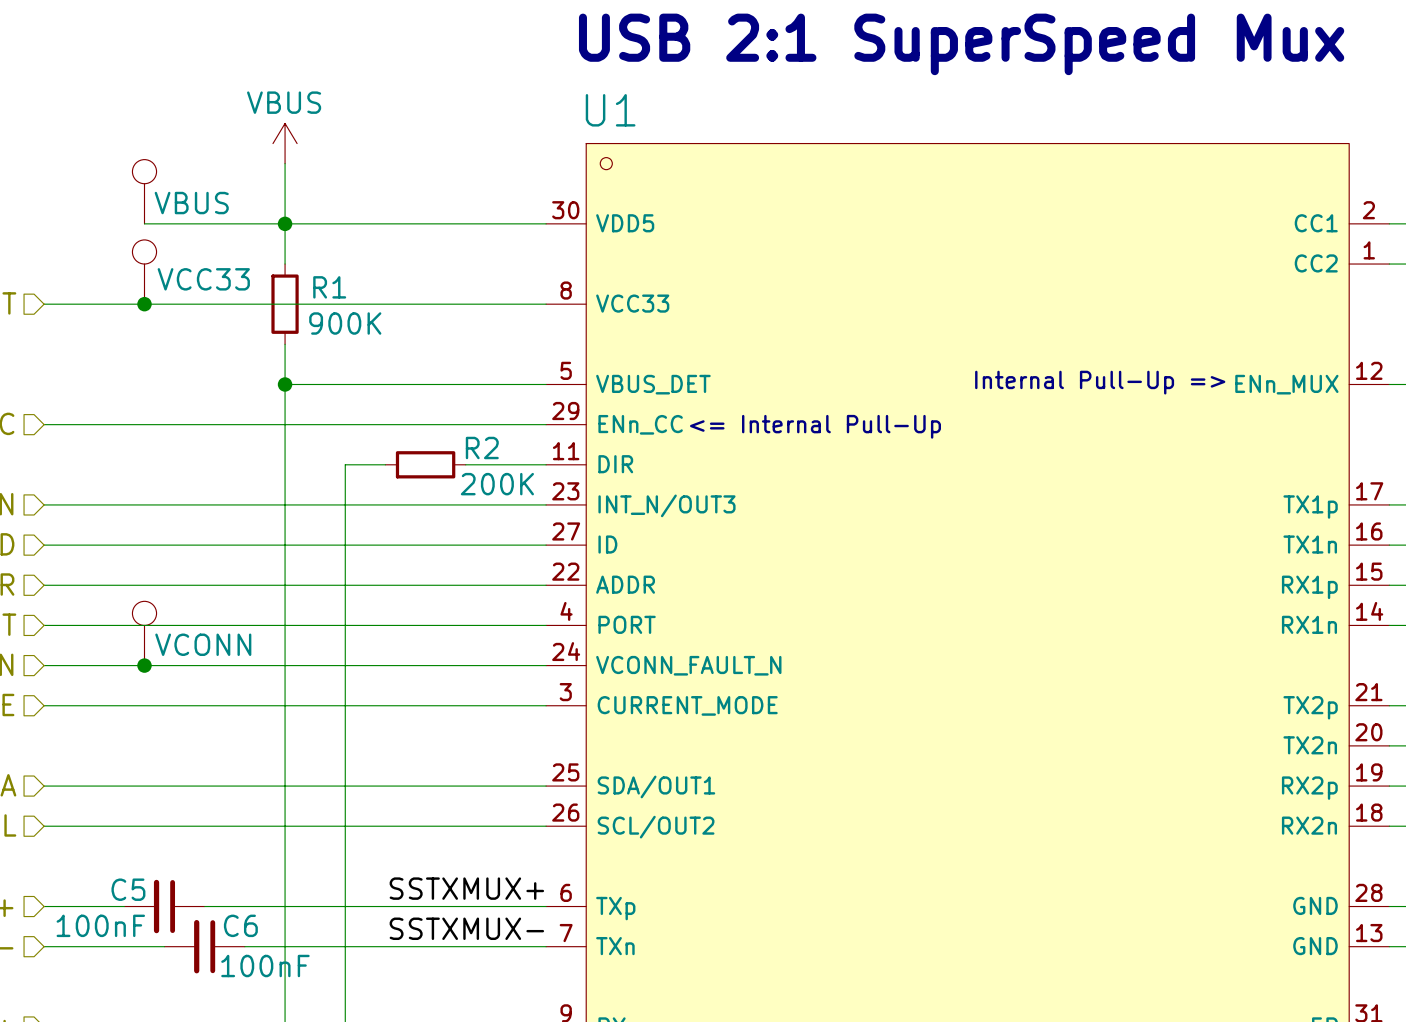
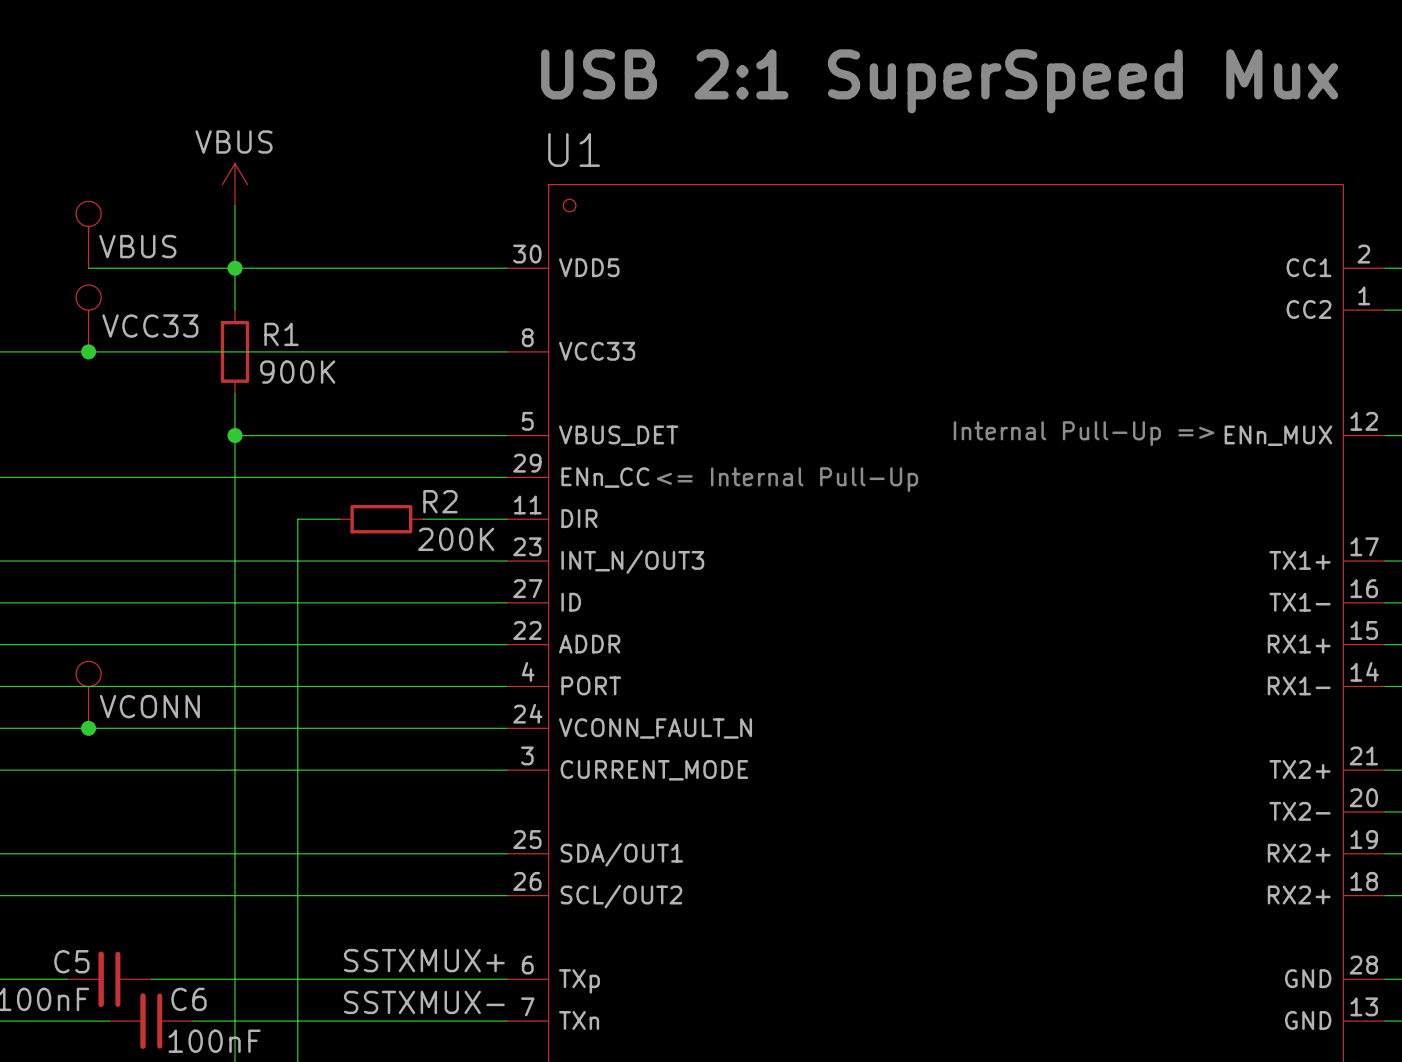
U1 pin name: TX1p (1310, 507) -> TX1+ (1299, 560)
U1 pin name: TX1n (1310, 544) -> TX1- (1299, 602)
U1 pin name: RX1p (1309, 587) -> RX1+ (1299, 644)
U1 pin name: RX1n (1309, 624) -> RX1- (1299, 685)
U1 pin name: TX2p (1310, 707) -> TX2+ (1299, 769)
U1 pin name: TX2n (1310, 745) -> TX2- (1299, 811)
U1 pin name: RX2p (1309, 788) -> RX2+ (1299, 853)
U1 pin name: RX2n (1309, 825) -> RX2+ (1299, 895)

